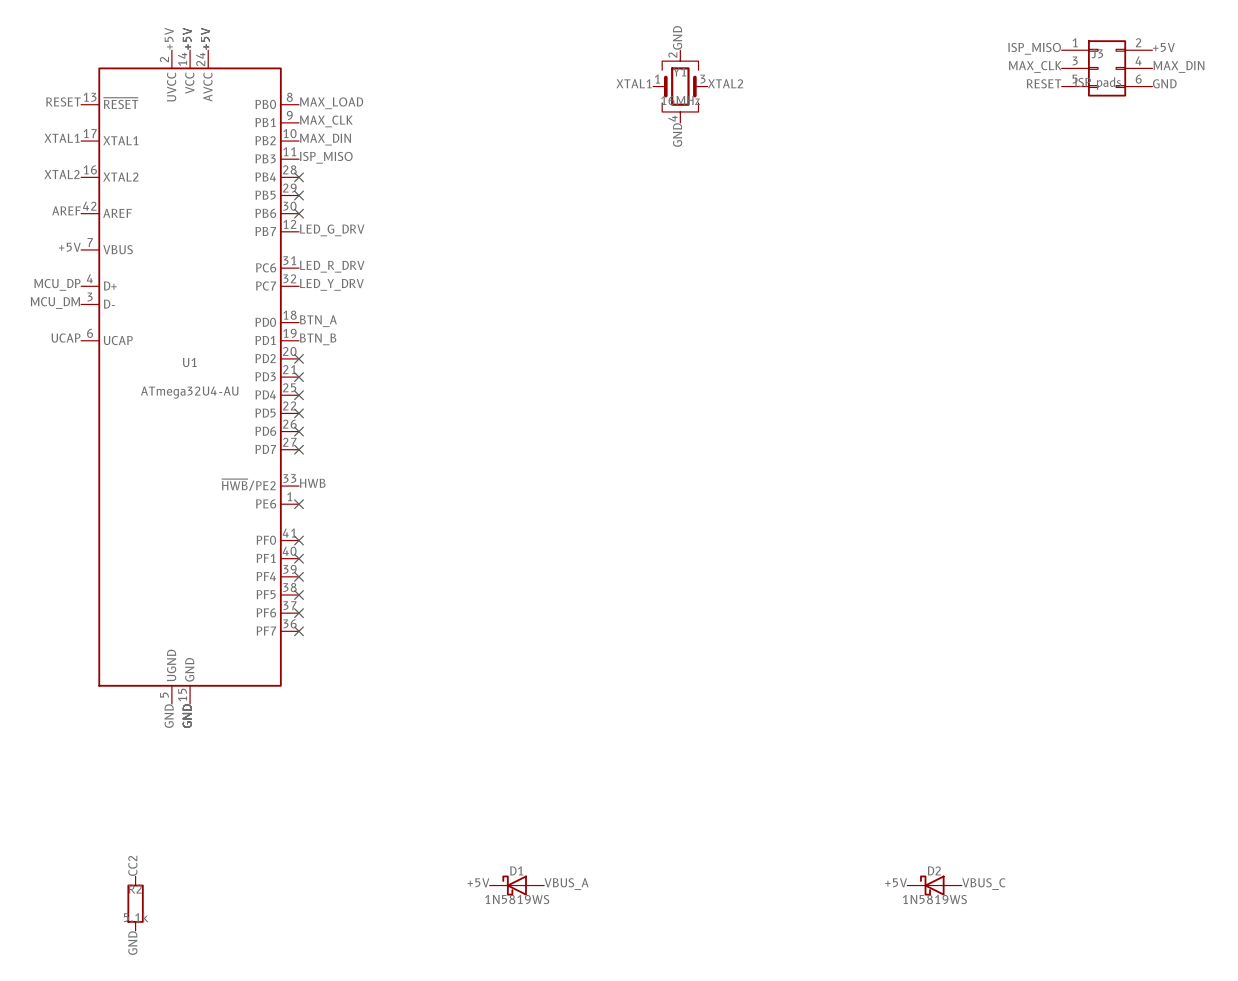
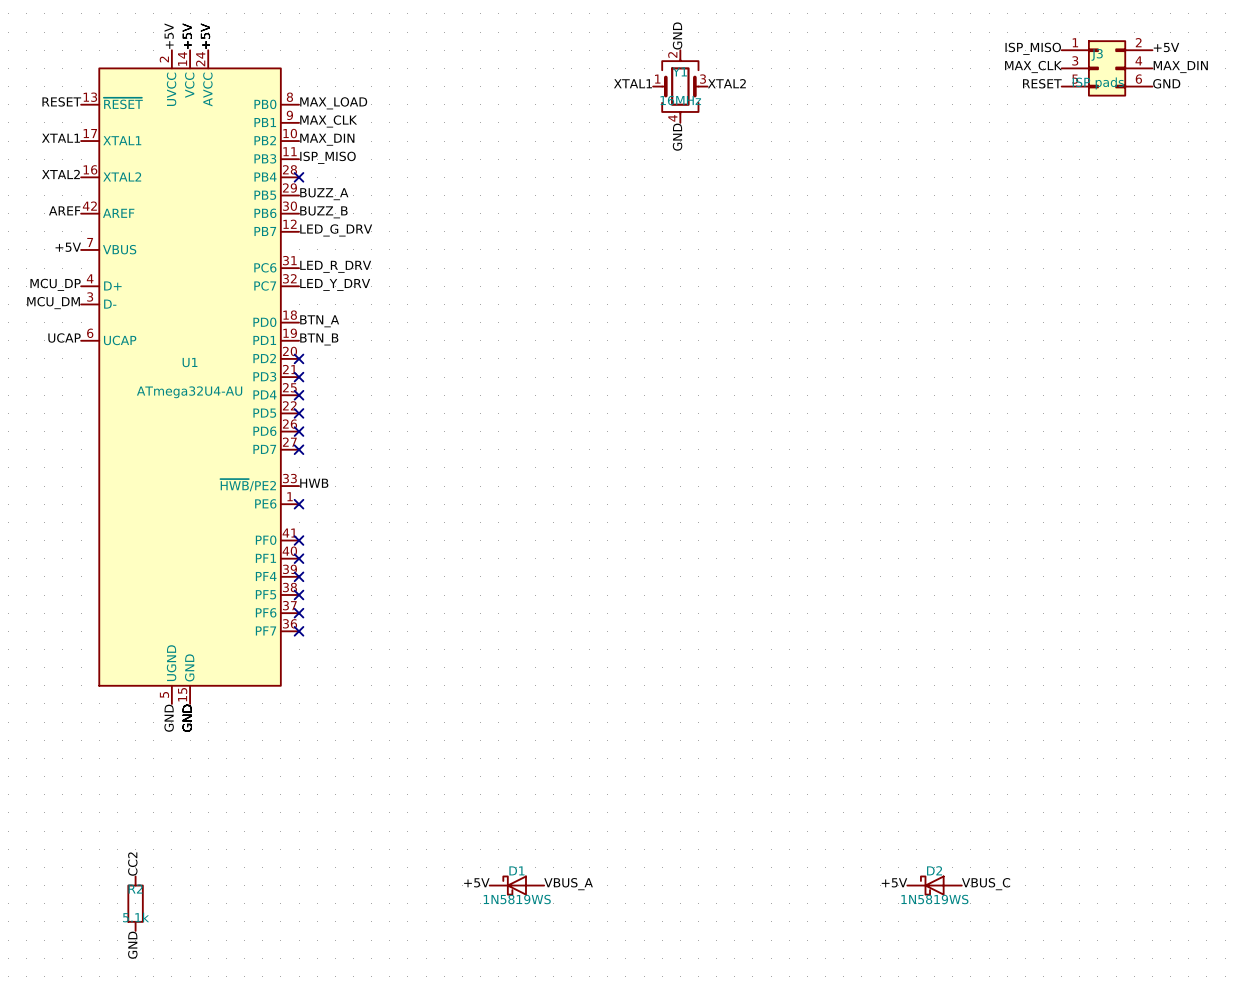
label: none -> BUZZ_A (324, 194)
no-connect mark: (299, 195) -> none
label: none -> BUZZ_B (323, 212)
no-connect mark: (299, 213) -> none

